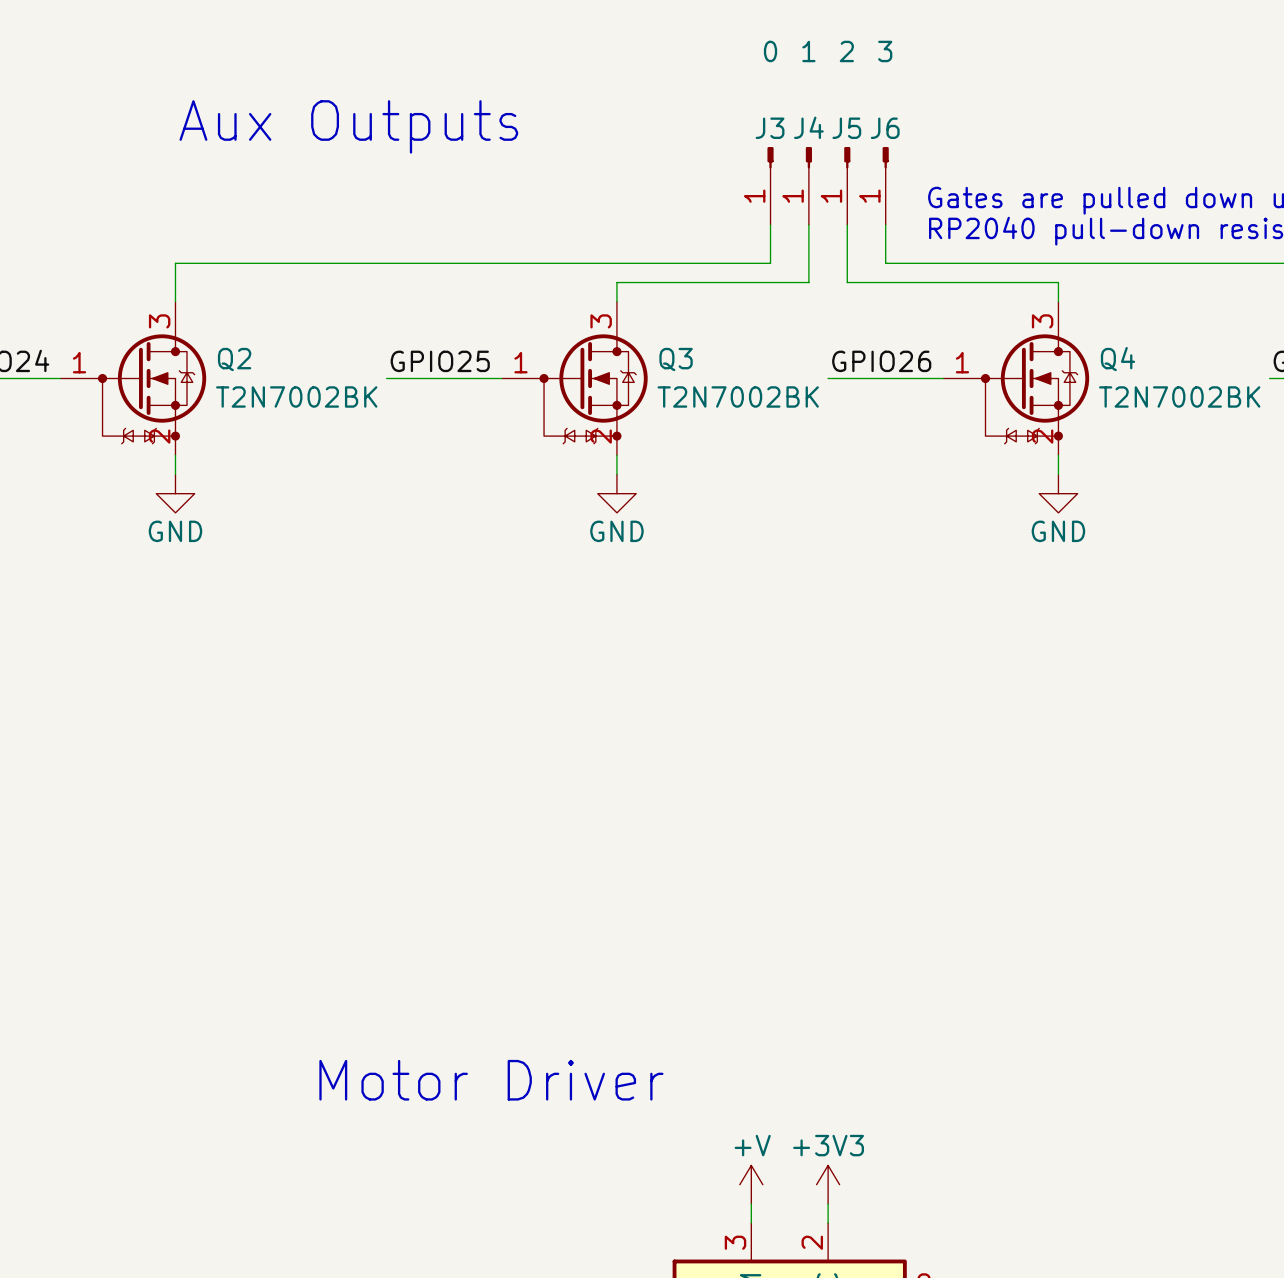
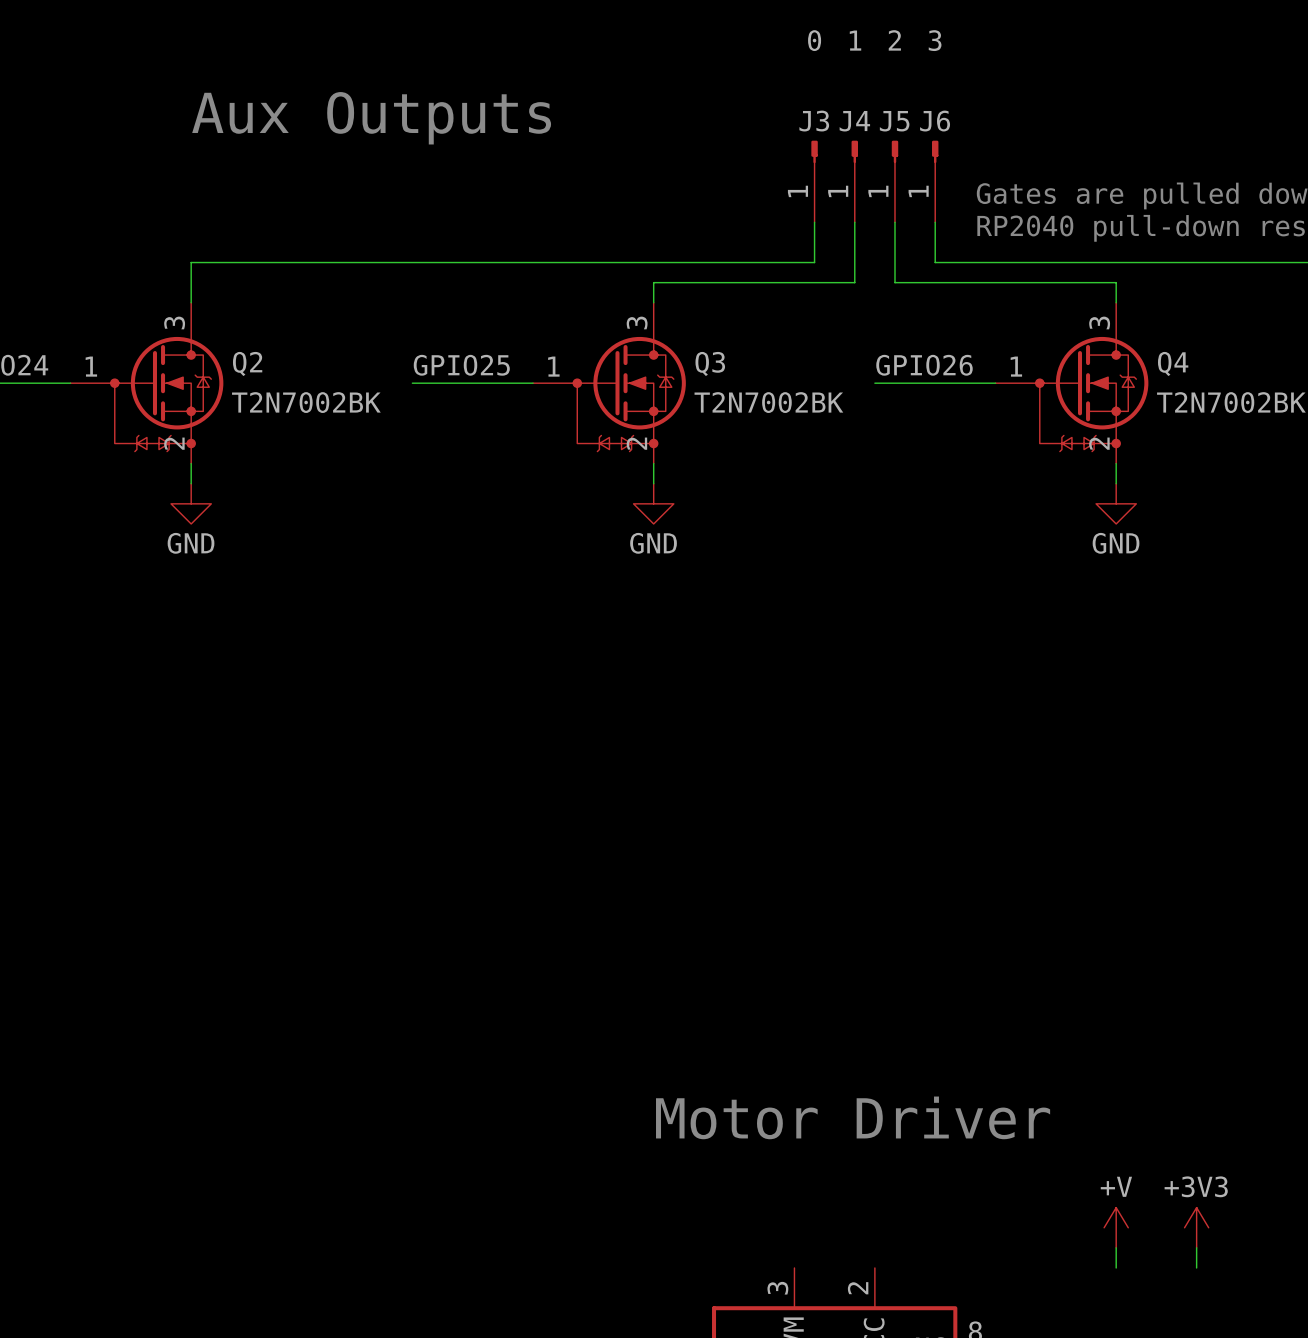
text position: Motor Driver (491, 1080) -> Motor Driver (853, 1117)
power symbol position: +V (751, 1184) -> +V (1116, 1227)
power symbol position: +3V3 (828, 1184) -> +3V3 (1196, 1227)
wire: (751, 1203) (751, 1223) -> (1116, 1247) (1116, 1267)
wire: (828, 1203) (828, 1223) -> (1196, 1247) (1196, 1267)

